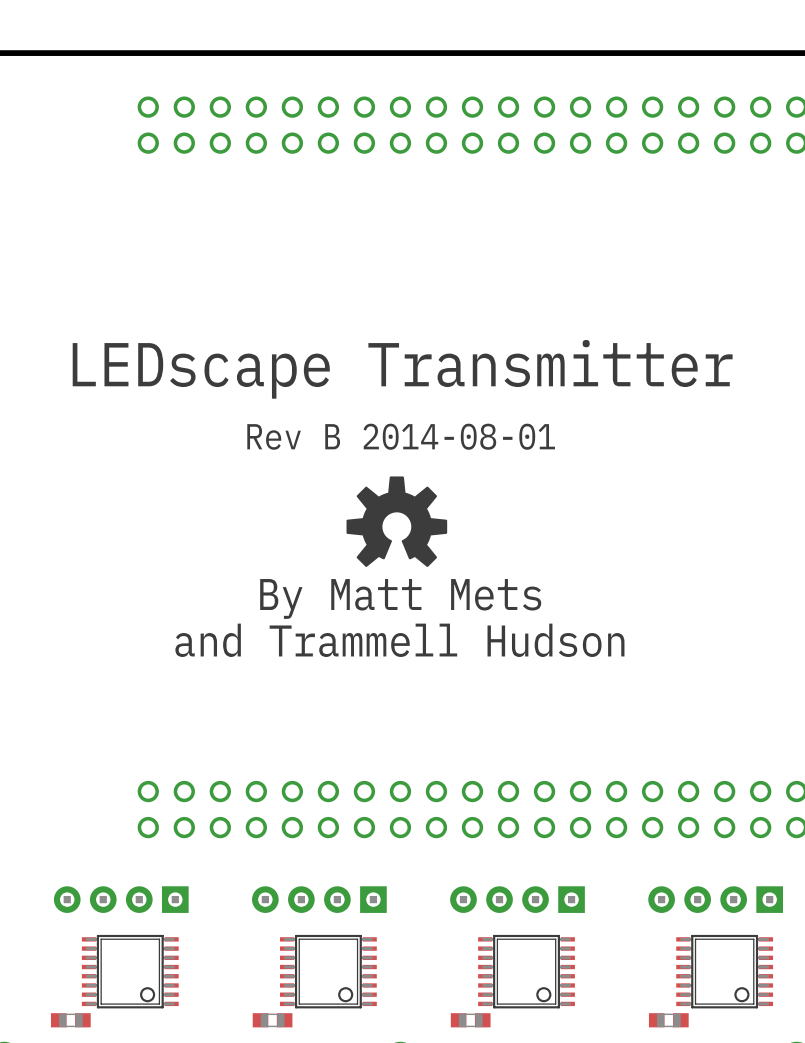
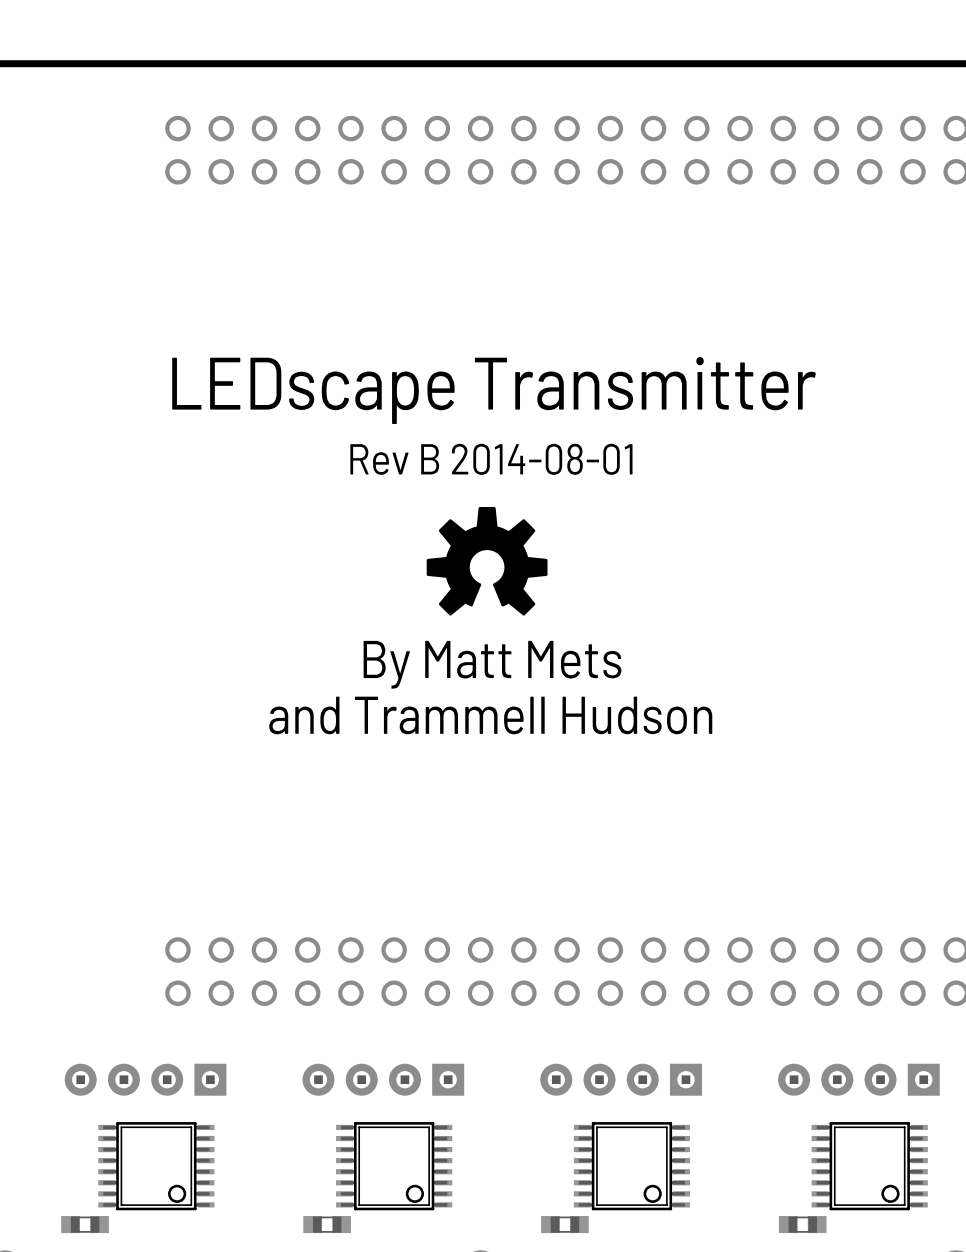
text: none -> LEDscape Transmitter (494, 390)
text: LEDscape Transmitter (402, 369) -> Rev B 2014-08-01 (491, 459)
text: Rev B 2014-08-01 (401, 436) -> none
drawing position: (396, 521) -> (487, 561)
text: none -> By Matt Mets (492, 664)
text: By Matt Mets (400, 598) -> and Trammell Hudson (490, 715)
text: and Trammell Hudson (399, 640) -> none

